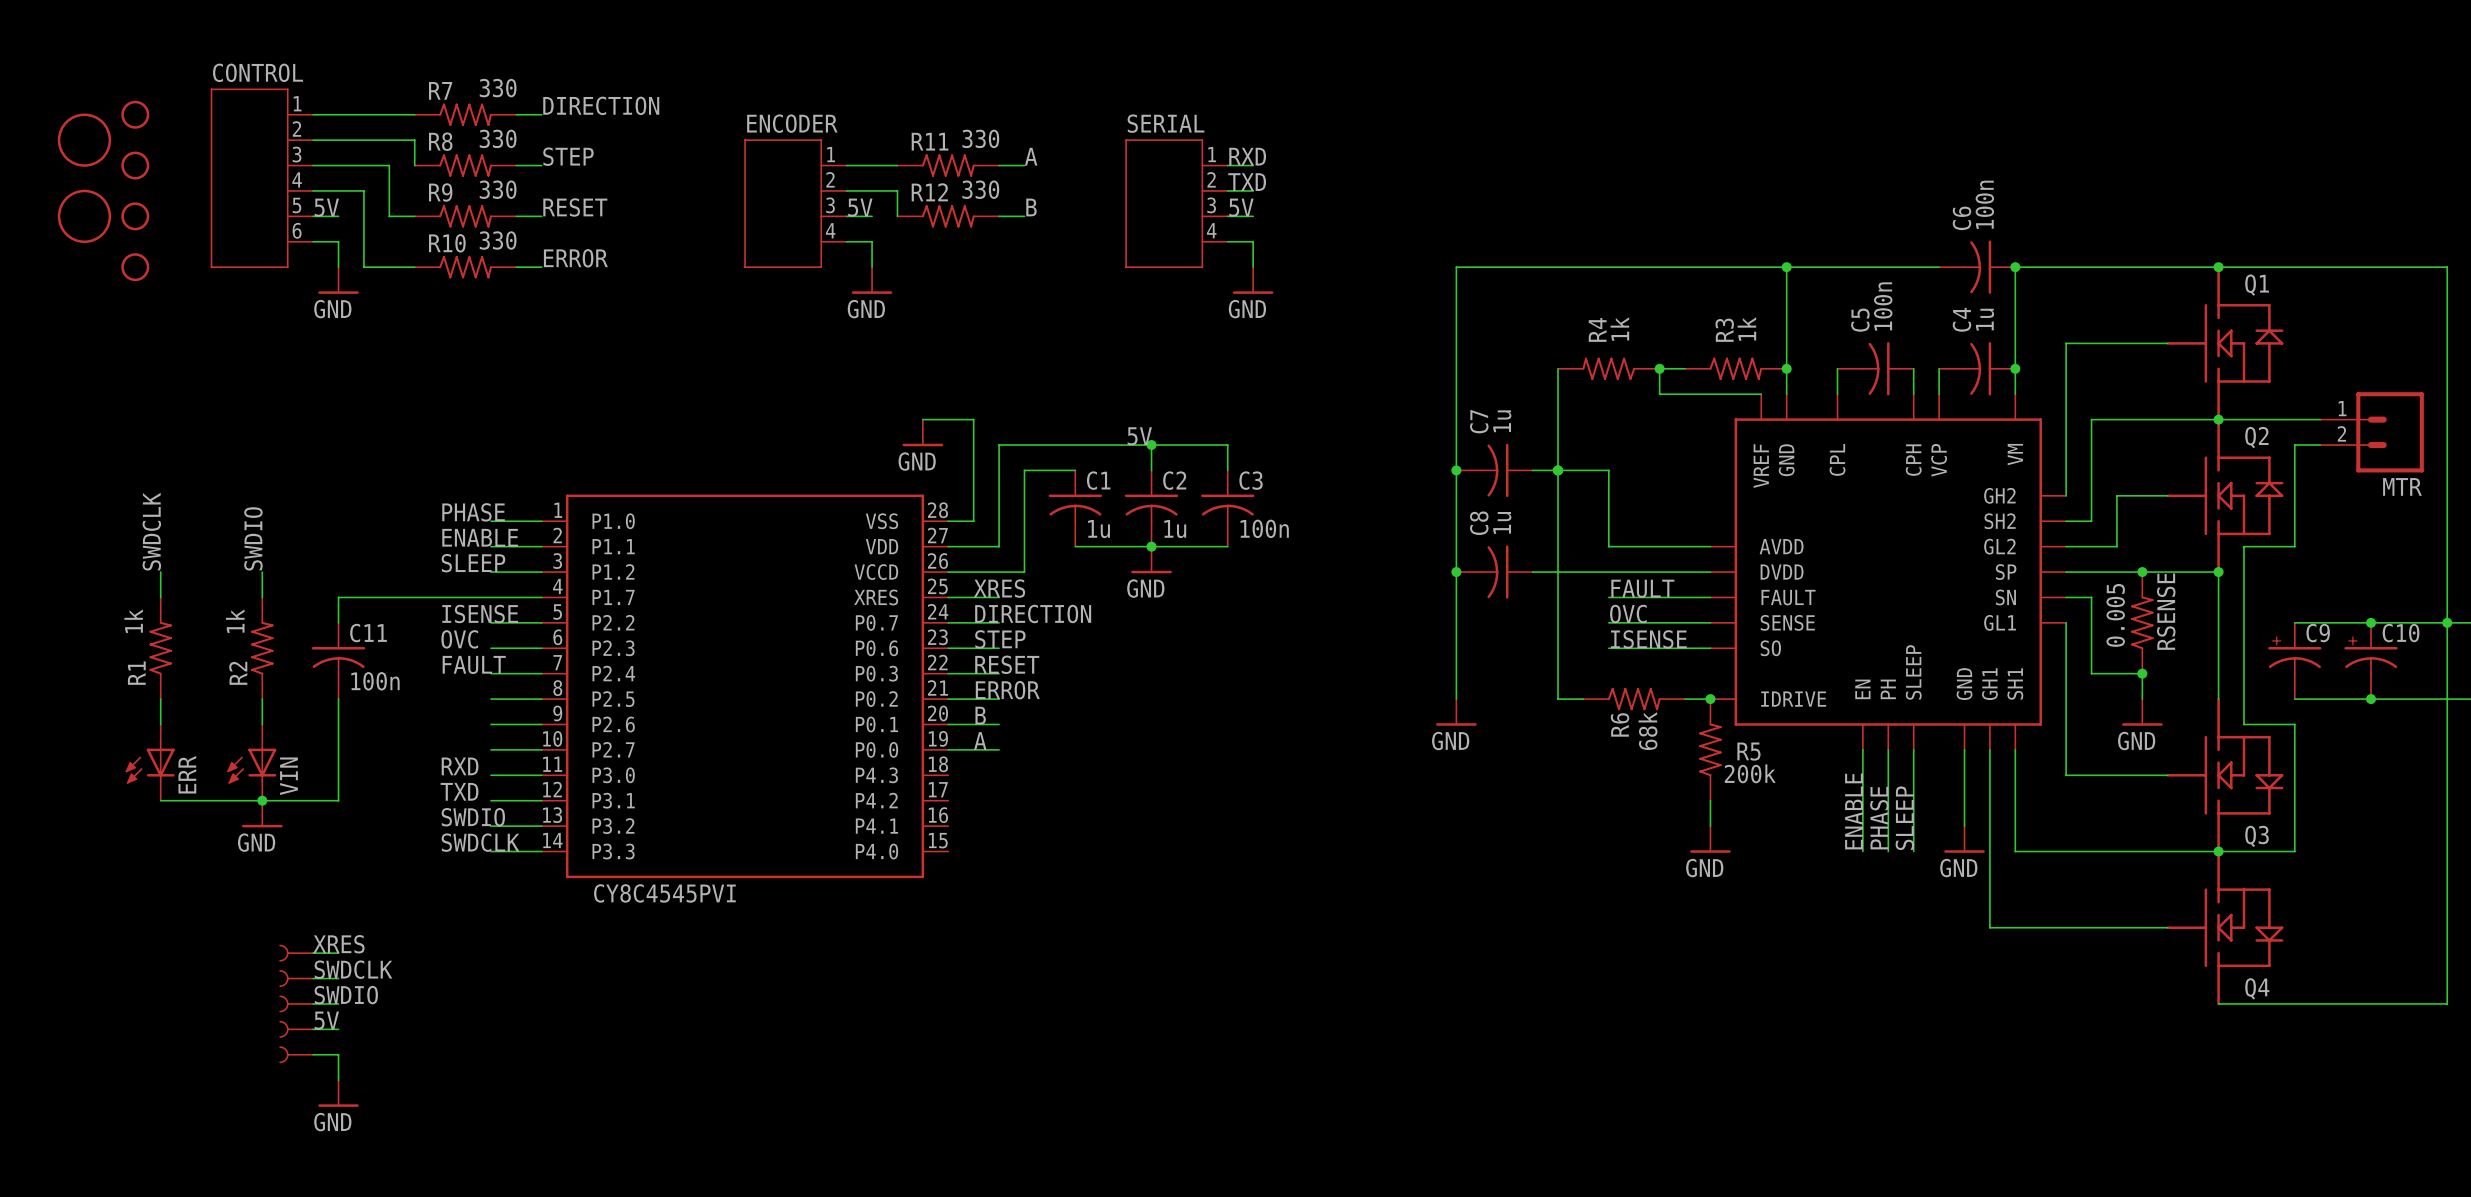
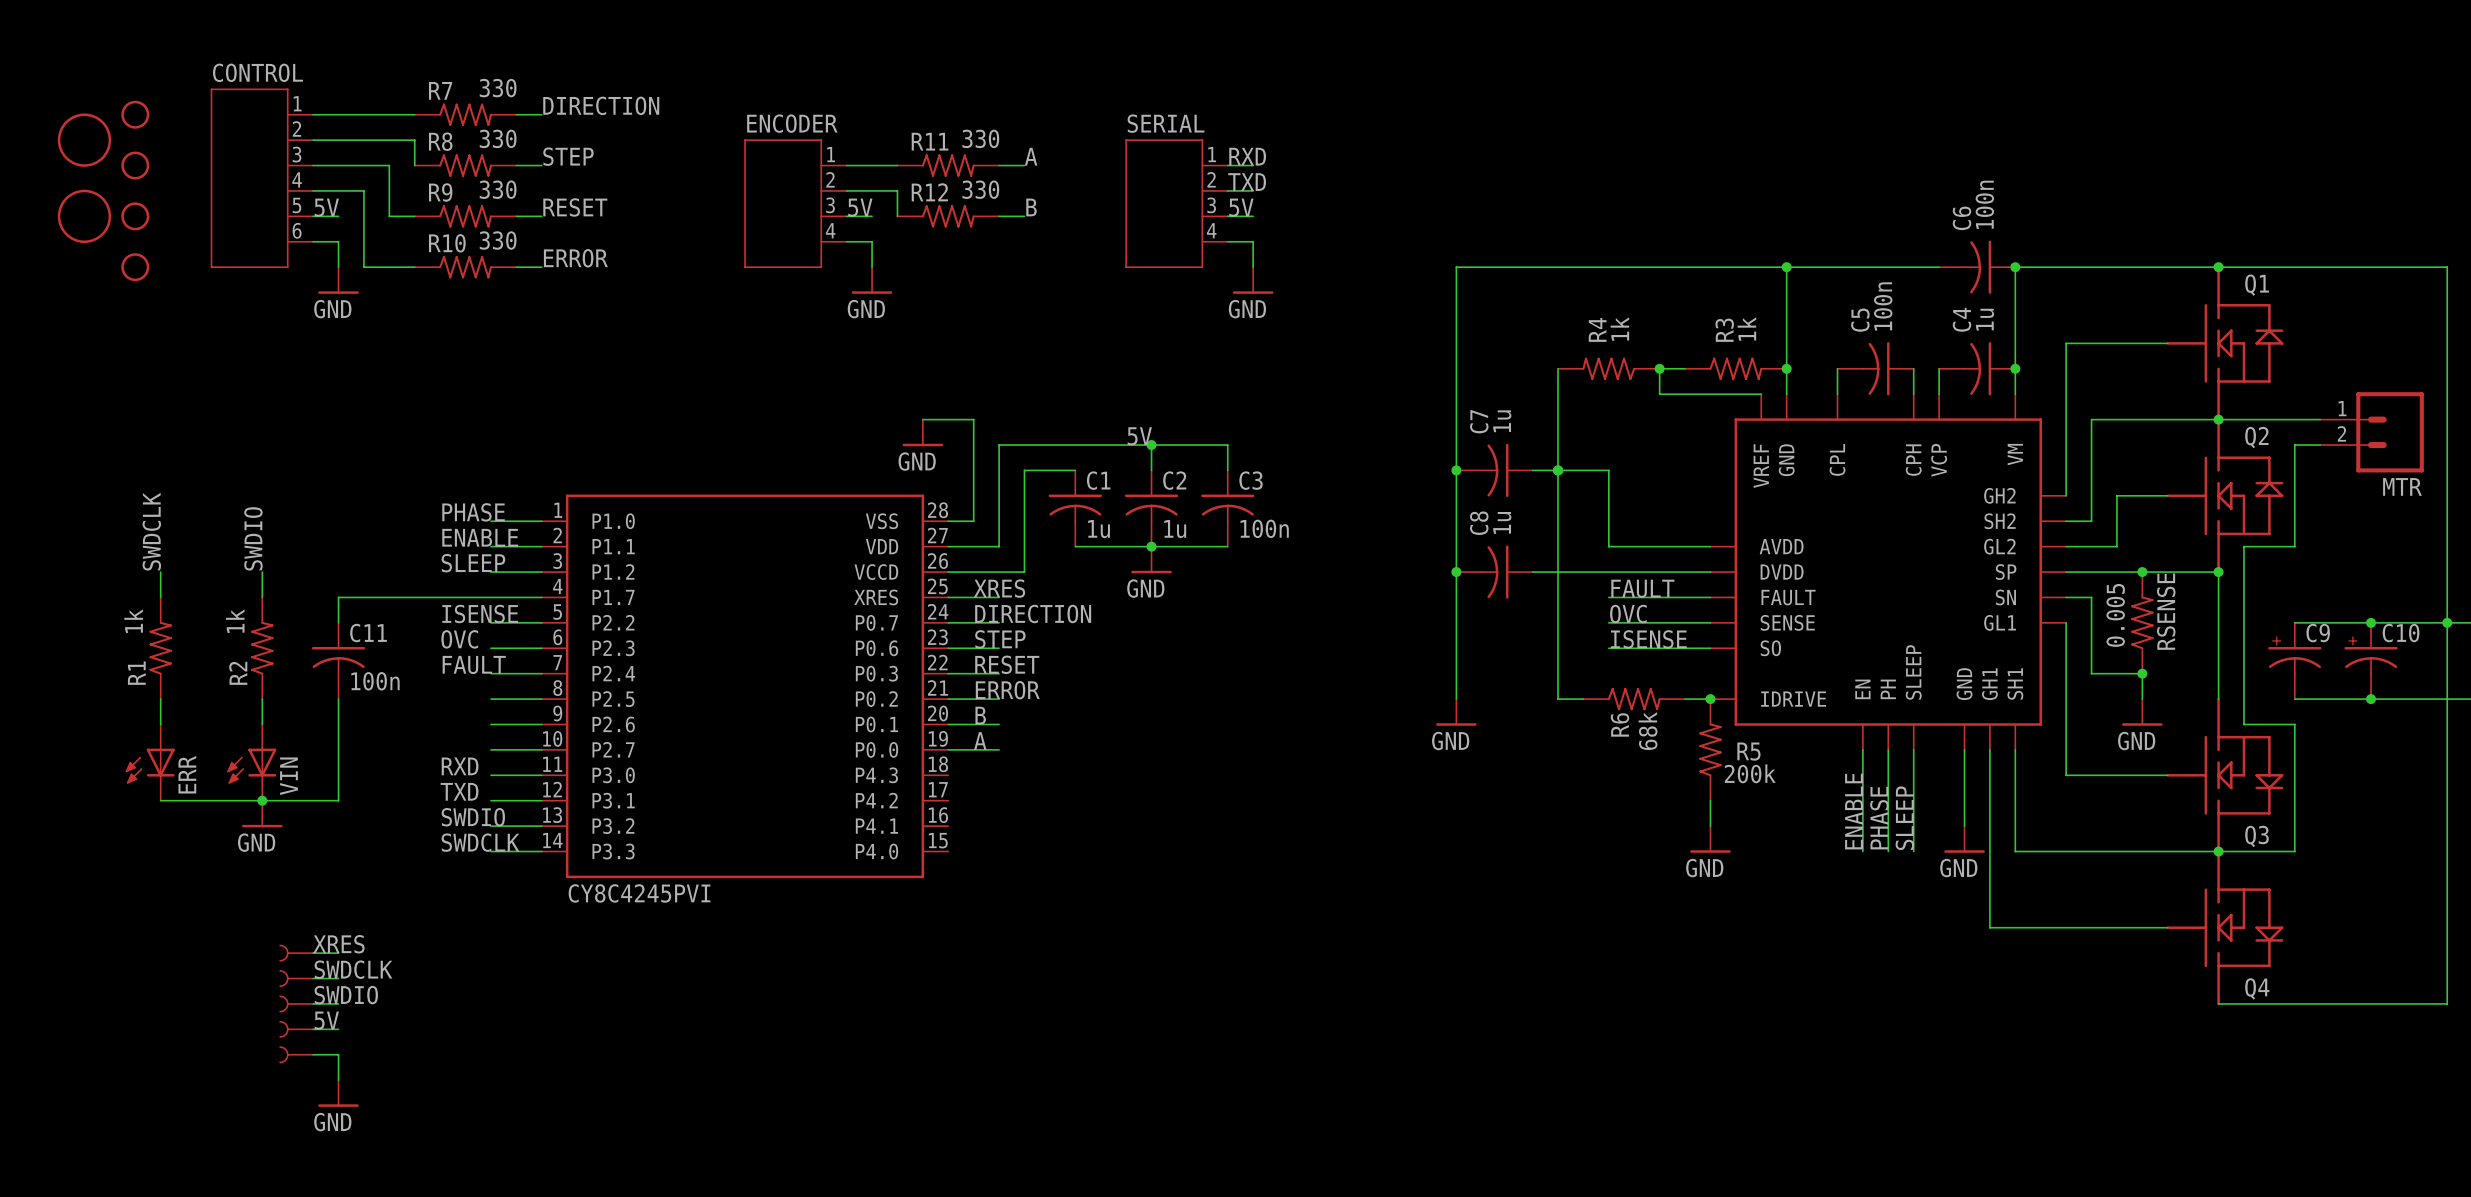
text: none -> CY8C4245PVI (639, 893)
part value: CY8C4545PVI (664, 893) -> none

